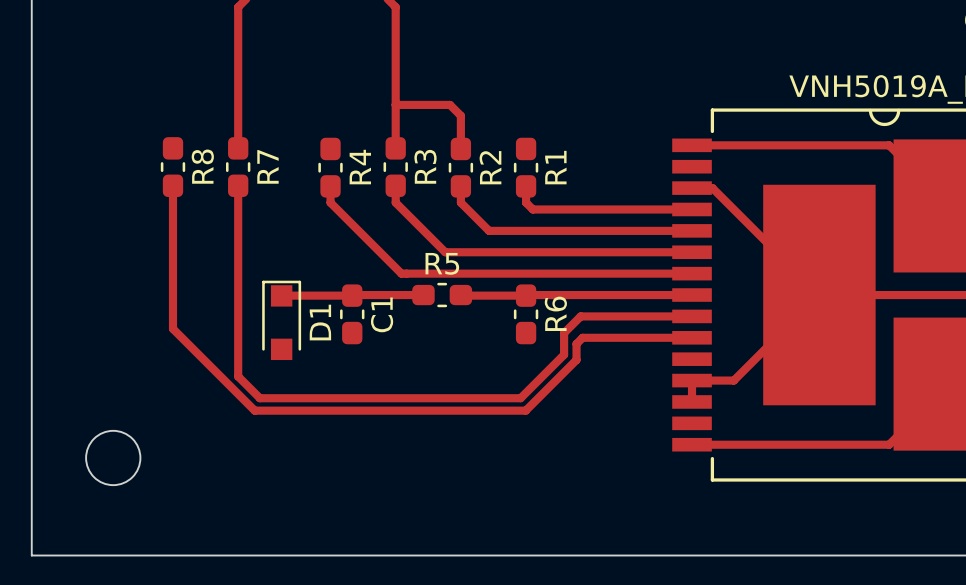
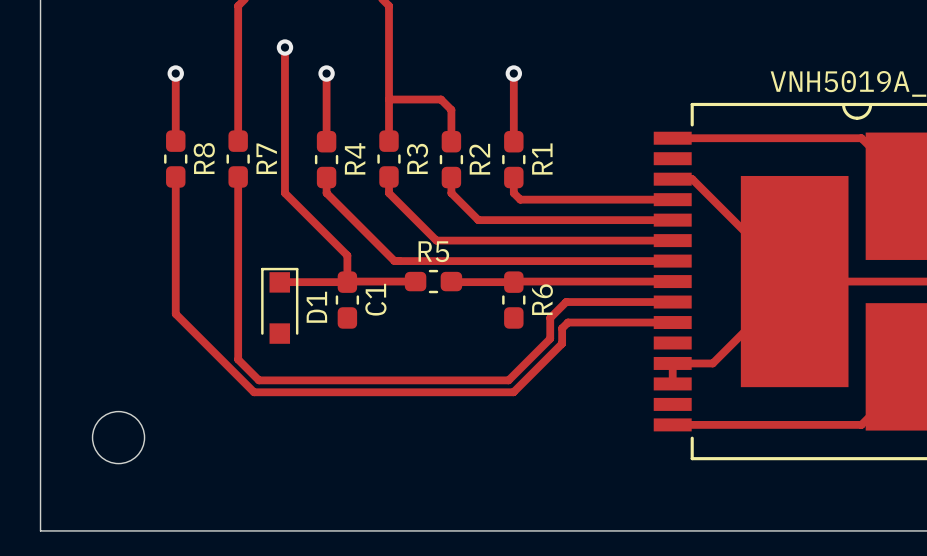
track: none -> (284, 47) (284, 193) (347, 255) (347, 282)
via: none -> (284, 47)
track: none -> (175, 73) (175, 141)
via: none -> (175, 73)
track: none -> (326, 73) (326, 141)
via: none -> (326, 73)
track: none -> (513, 73) (513, 141)
via: none -> (513, 73)

